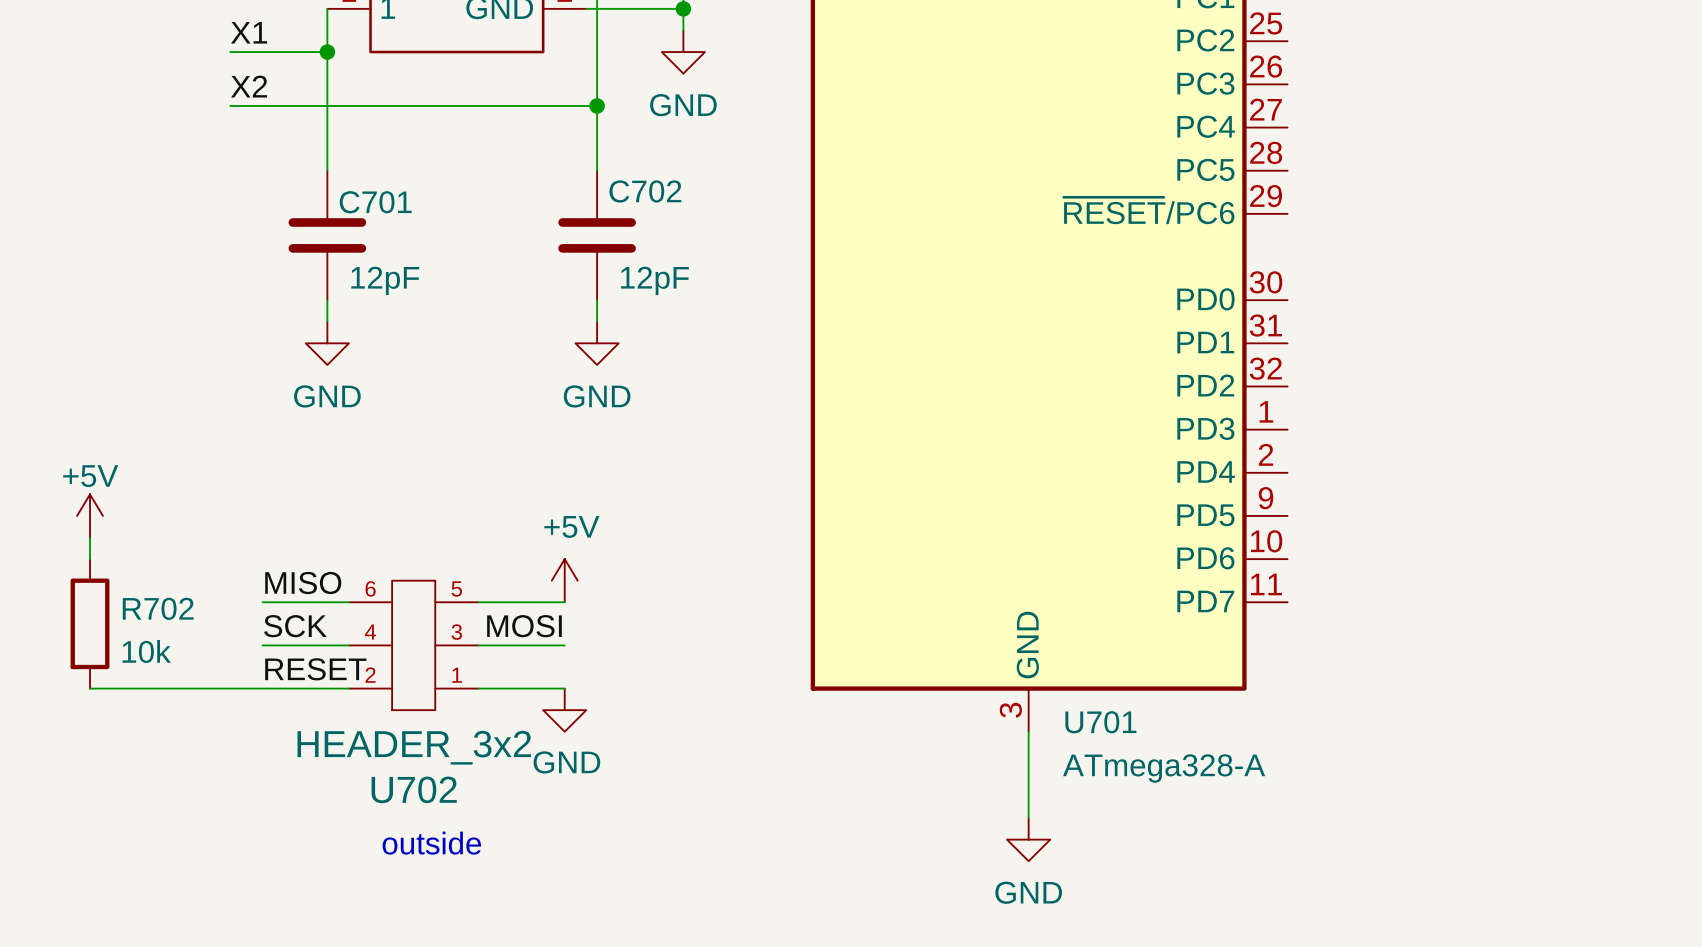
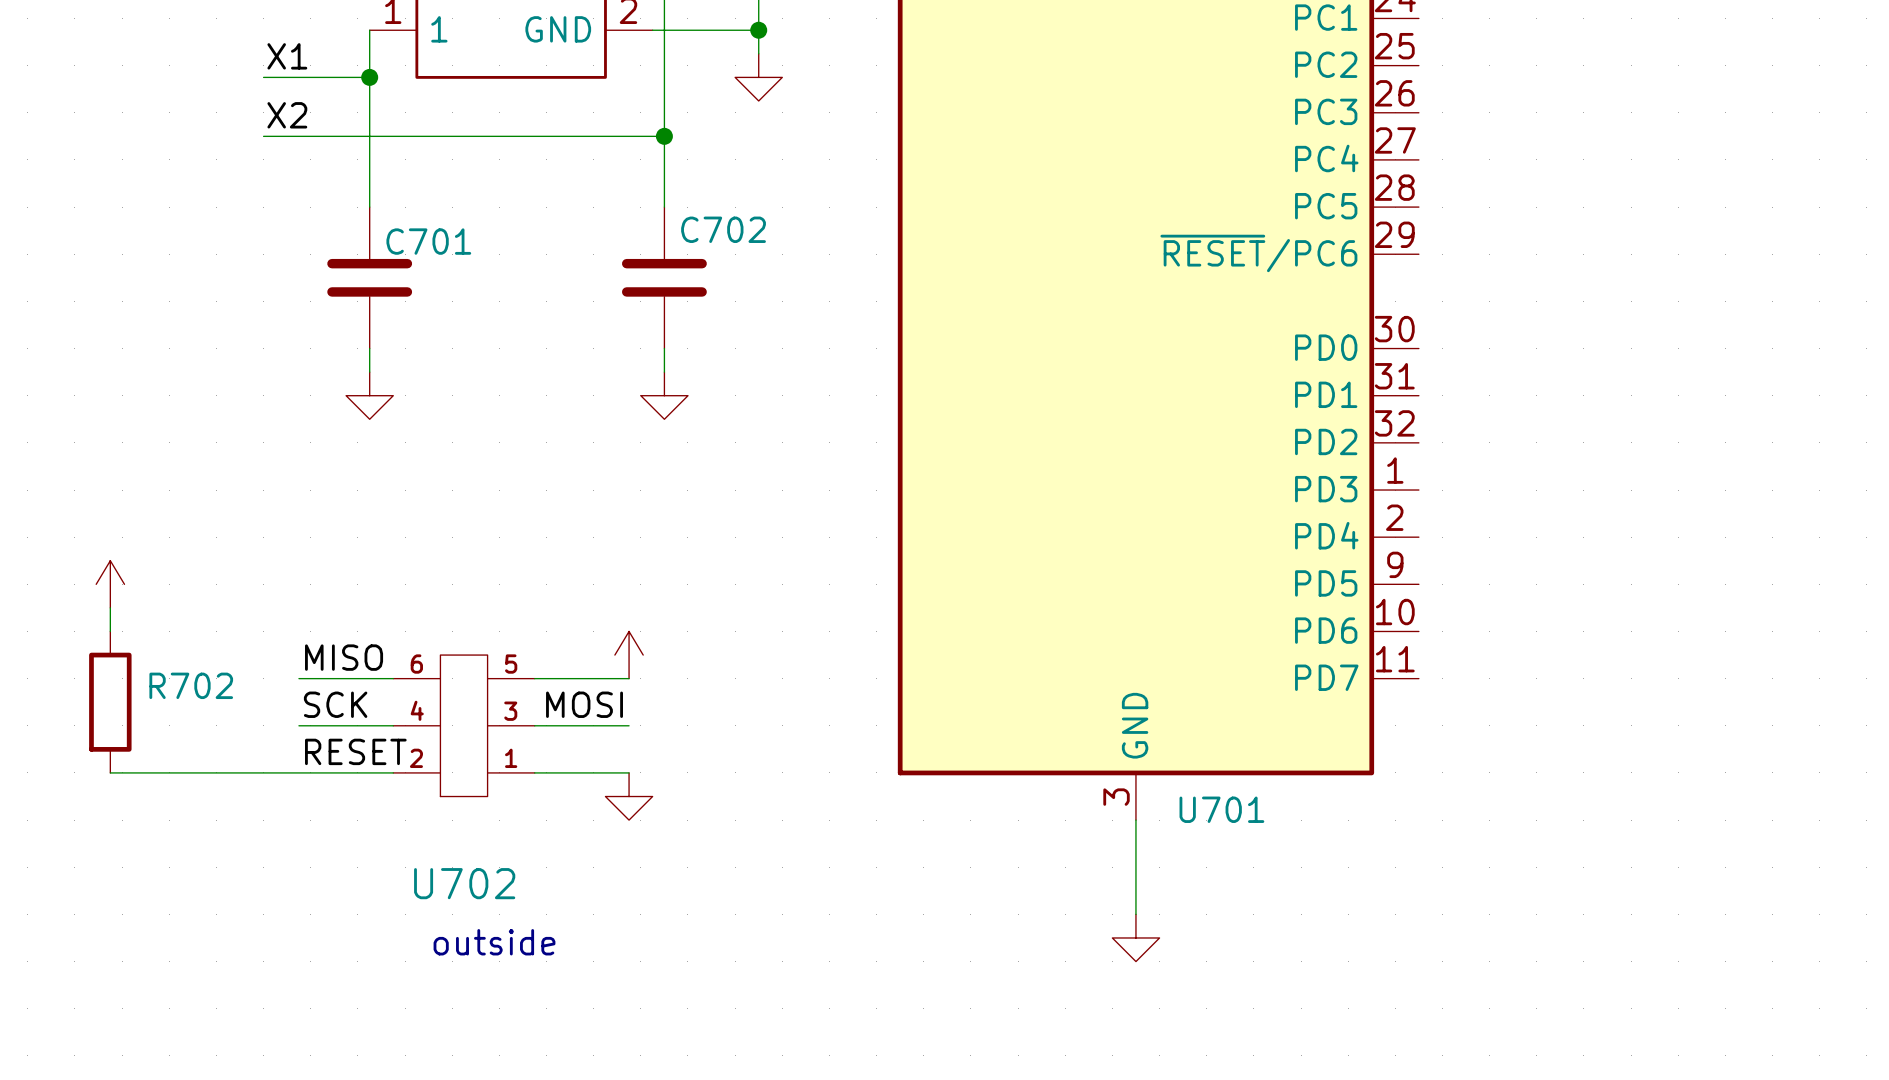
power symbol text: GND (683, 105) -> none
C701 value: 12pF (385, 280) -> none
C702 value: 12pF (654, 280) -> none
power symbol text: GND (327, 396) -> none
power symbol text: GND (597, 396) -> none
power symbol text: +5V (90, 476) -> none
power symbol text: +5V (571, 526) -> none
R702 value: 10k (146, 651) -> none
U702 value: HEADER_3x2 (414, 747) -> none
power symbol text: GND (566, 762) -> none
U701 value: ATmega328-A (1164, 768) -> none
power symbol text: GND (1028, 892) -> none

